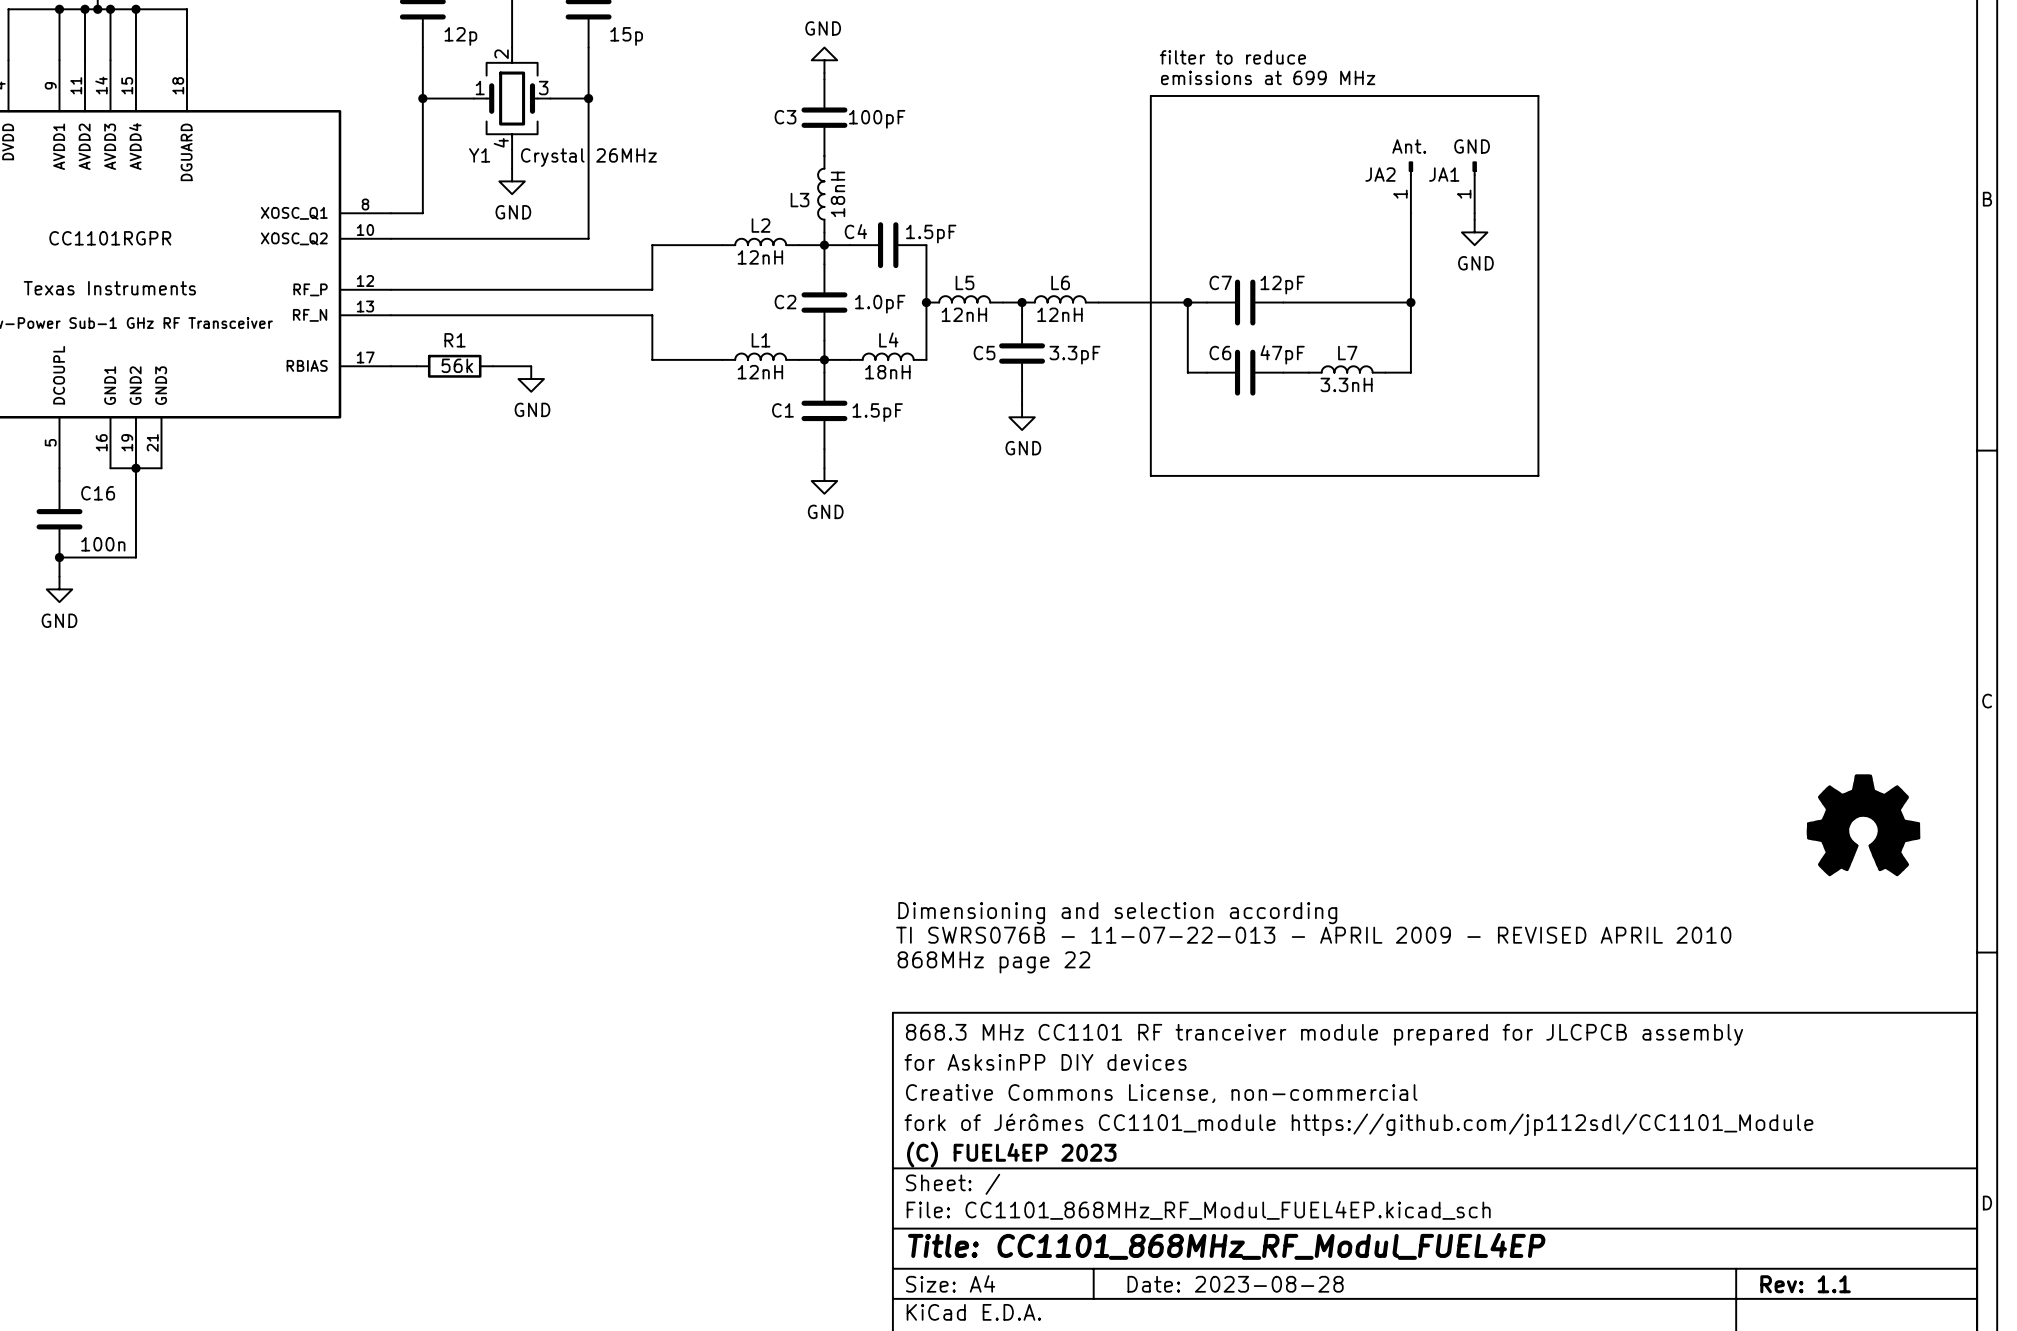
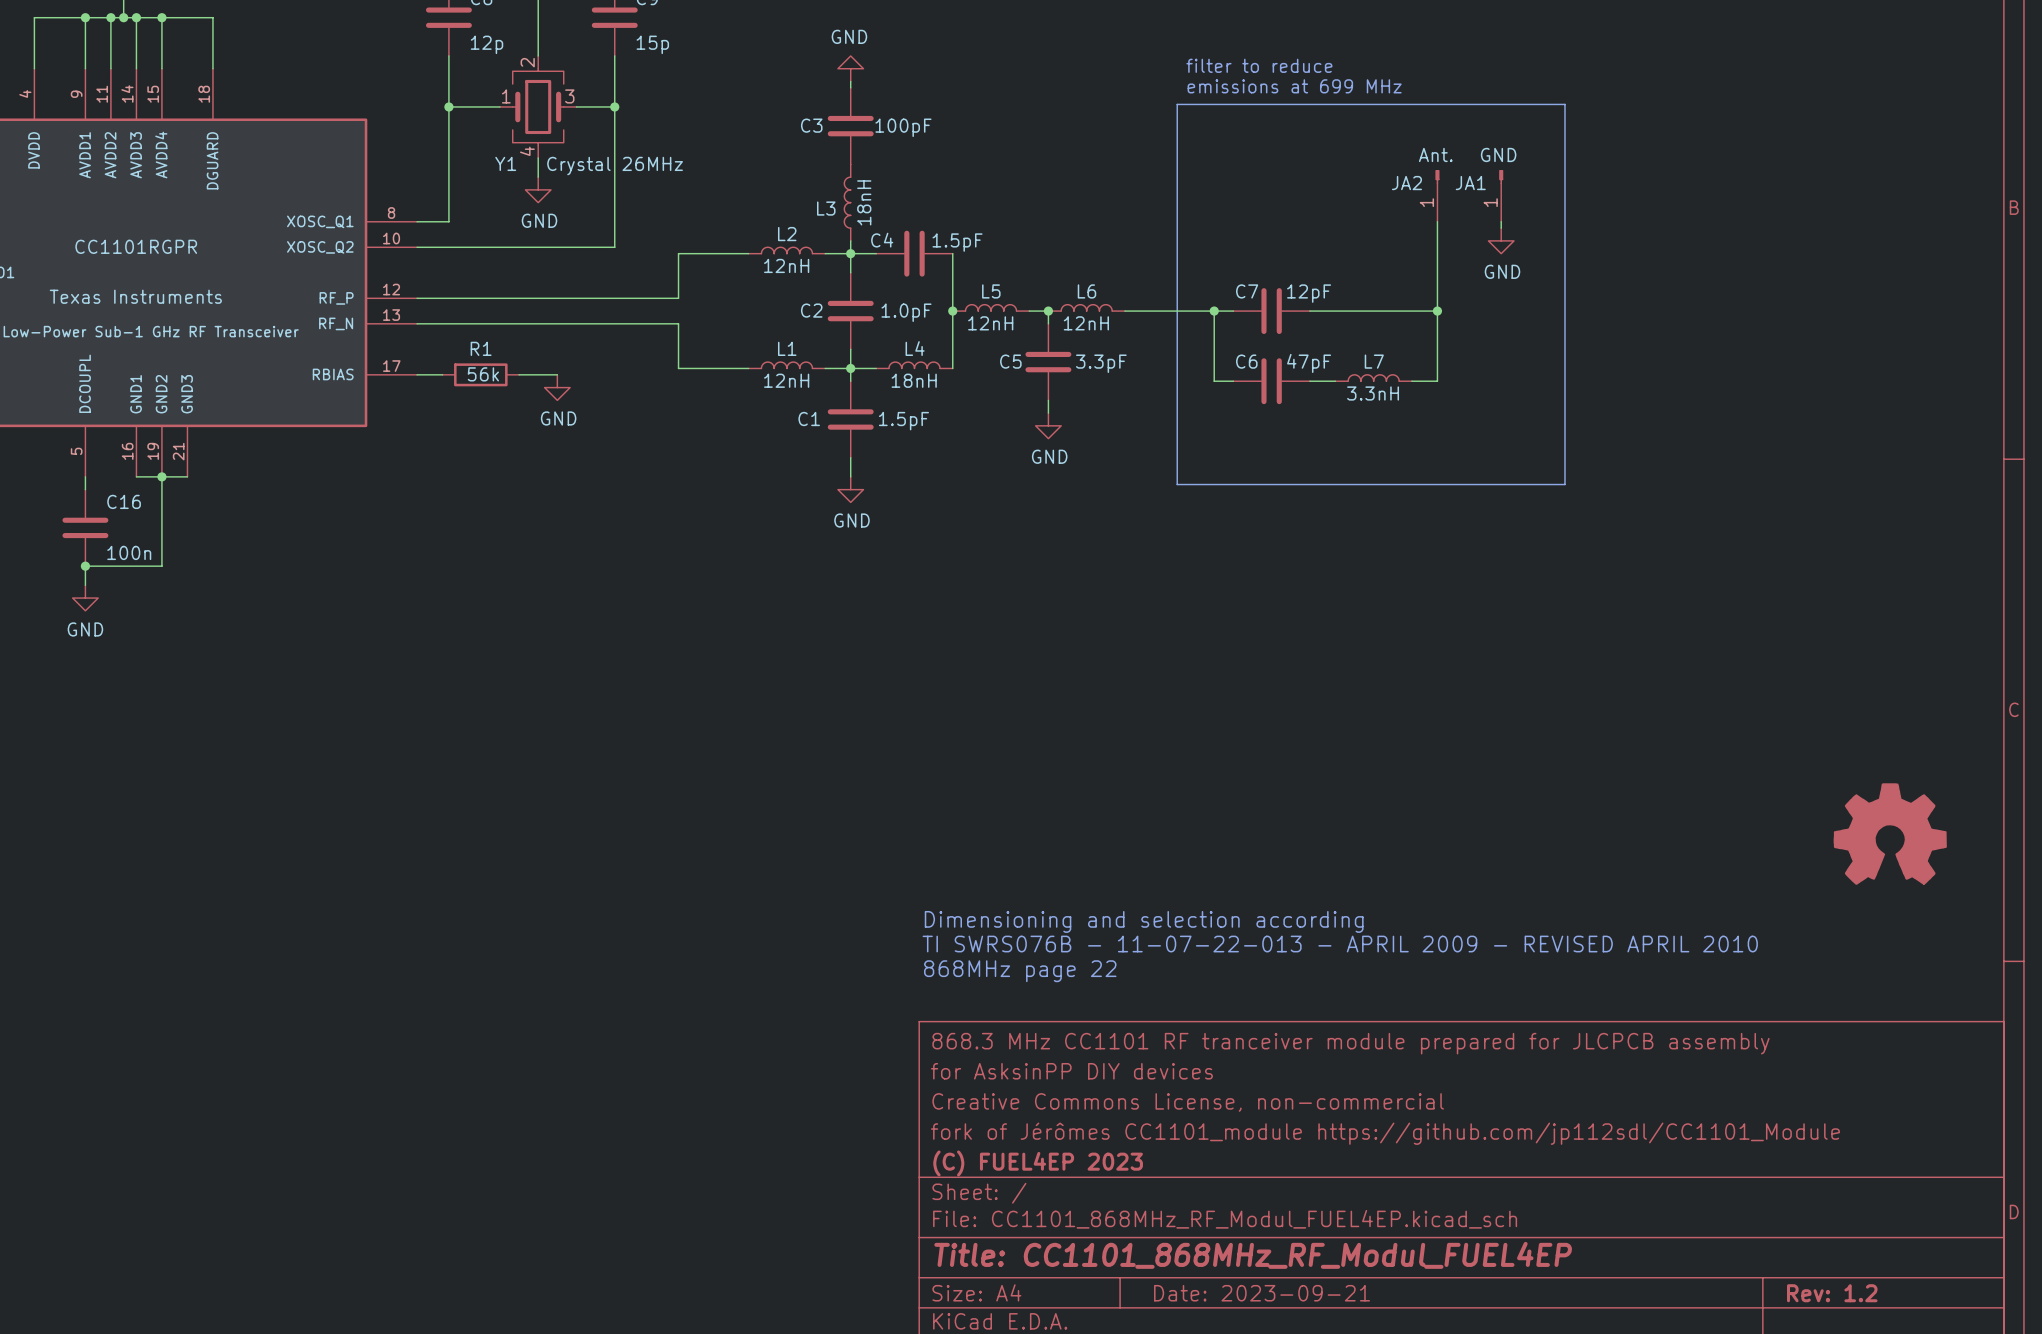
title block: Date: 2023-08-28 (1235, 1284) -> Date: 2023-09-21 (1262, 1293)
title block: Rev: 1.1 (1805, 1284) -> Rev: 1.2 (1832, 1293)

